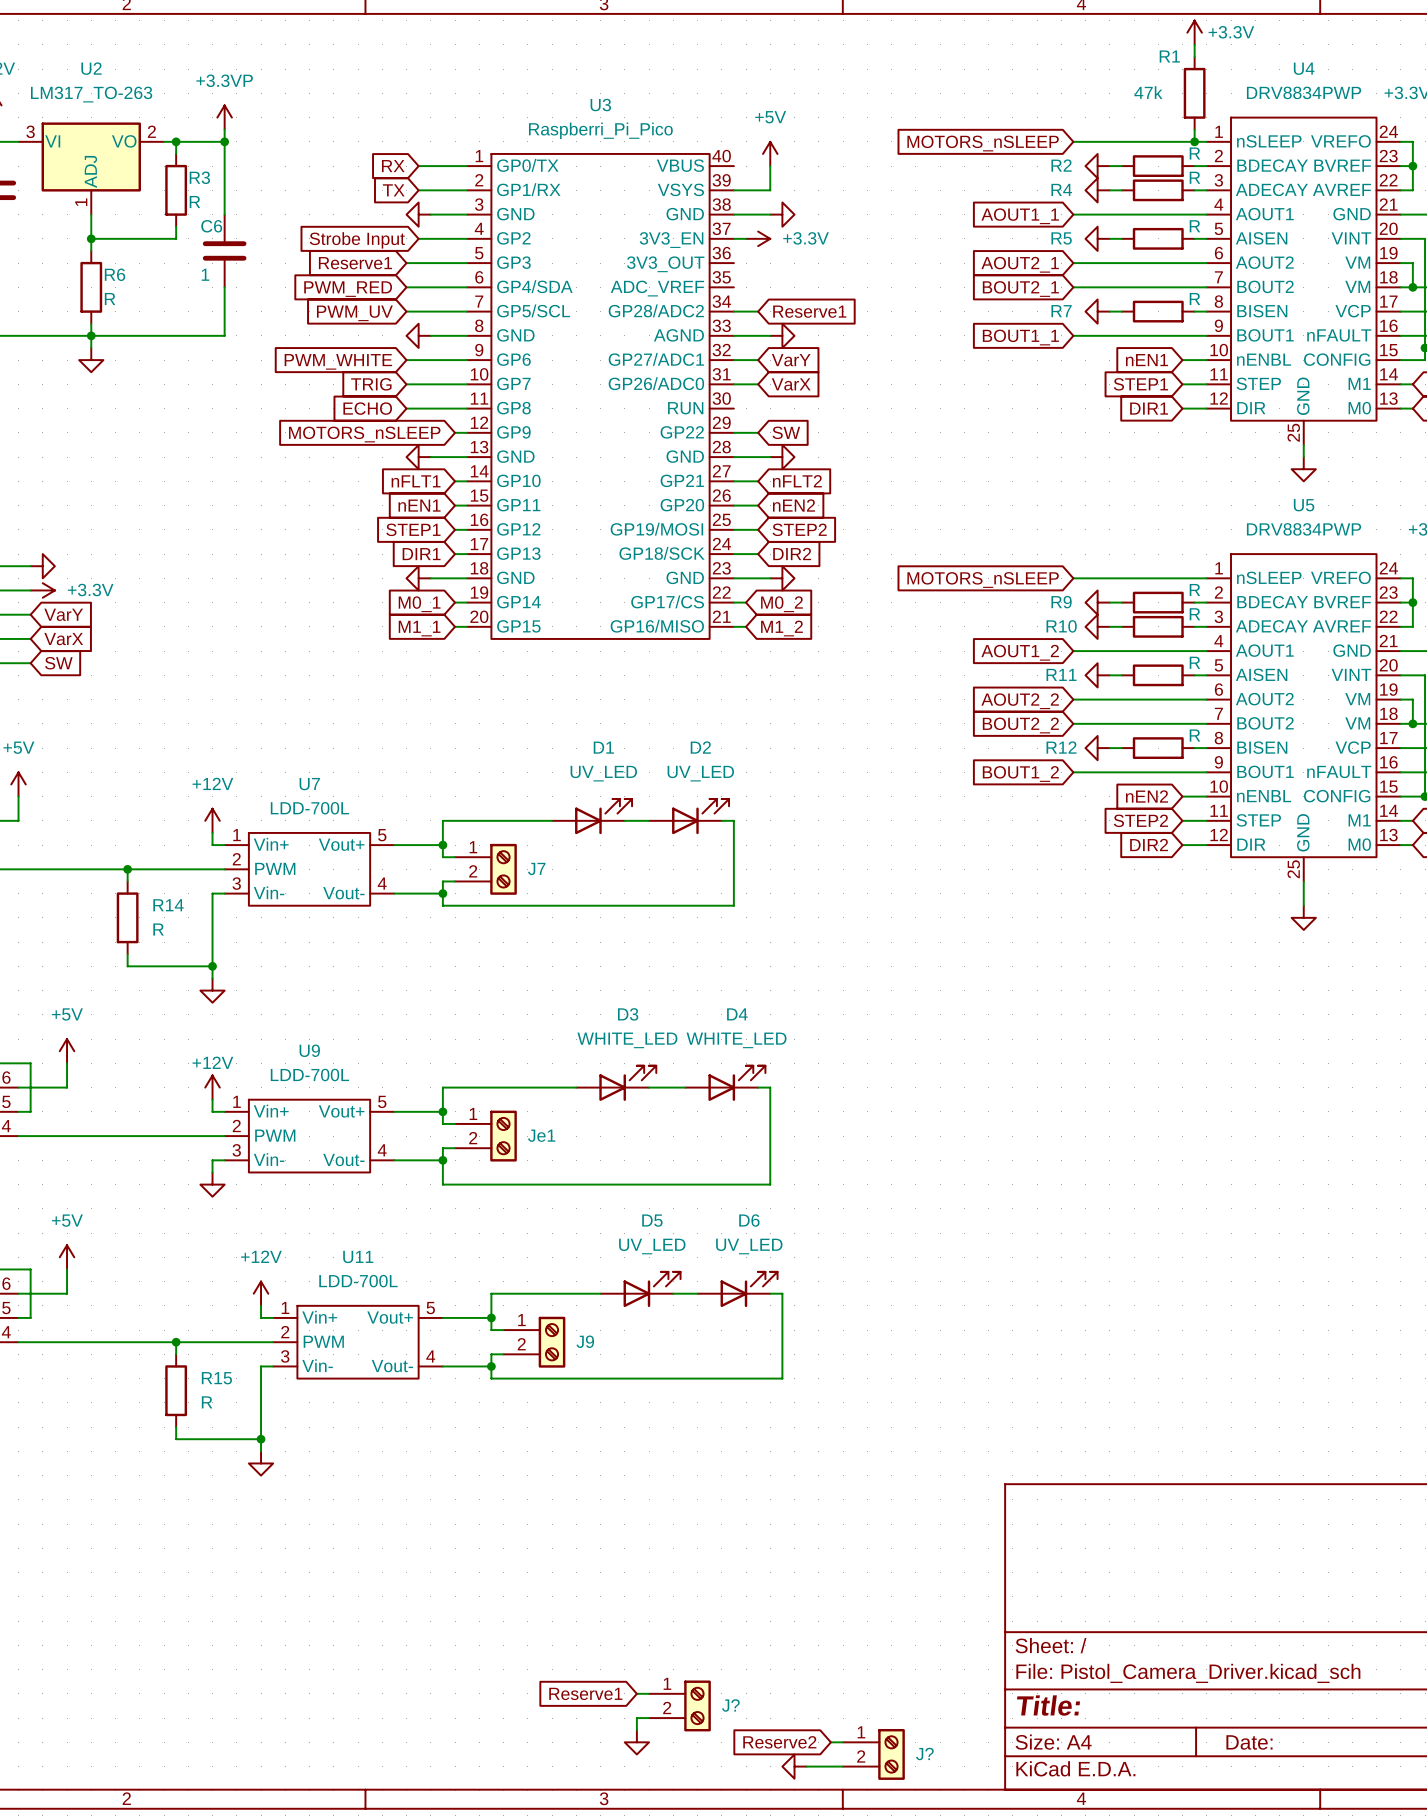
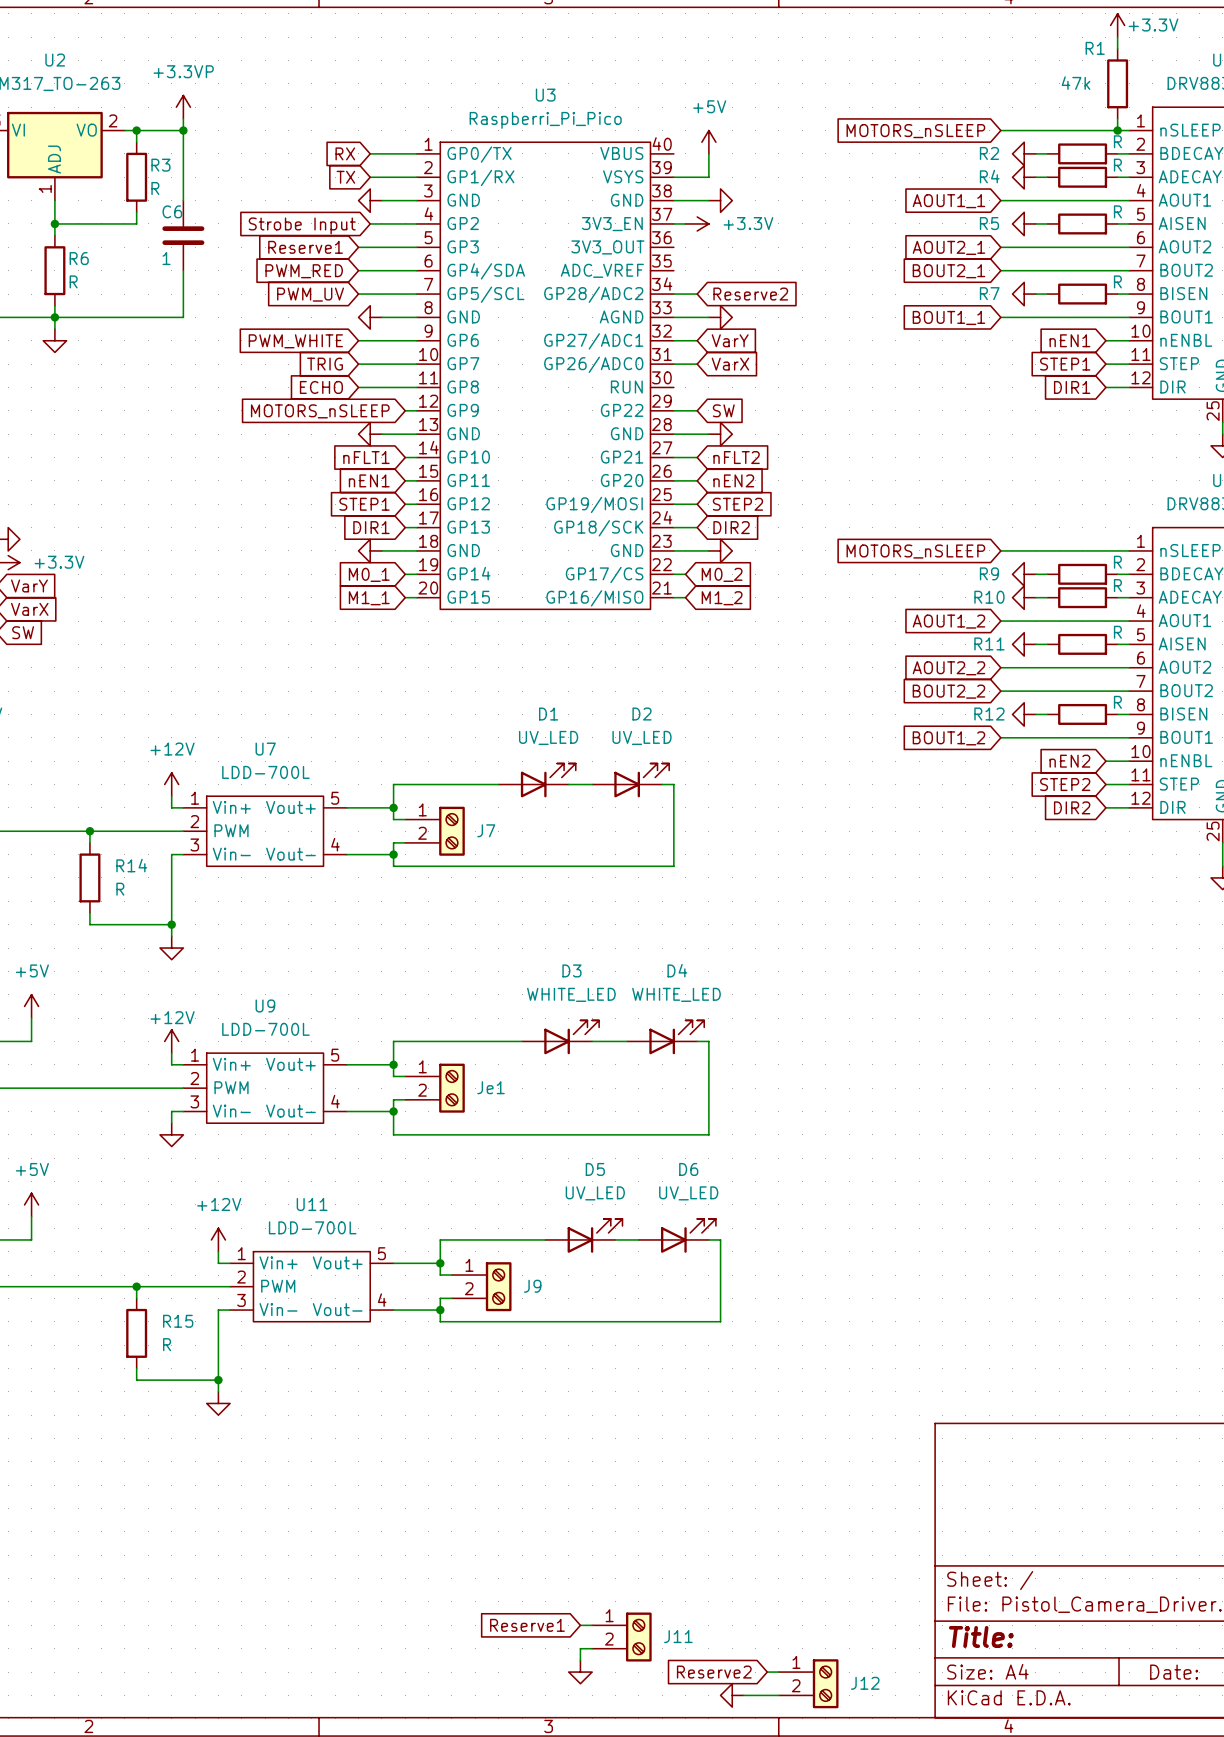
global label: Reserve1 (809, 311) -> Reserve2 (750, 294)
J? name: J? (730, 1705) -> J11 (678, 1636)
J? name: J? (924, 1753) -> J12 (865, 1683)

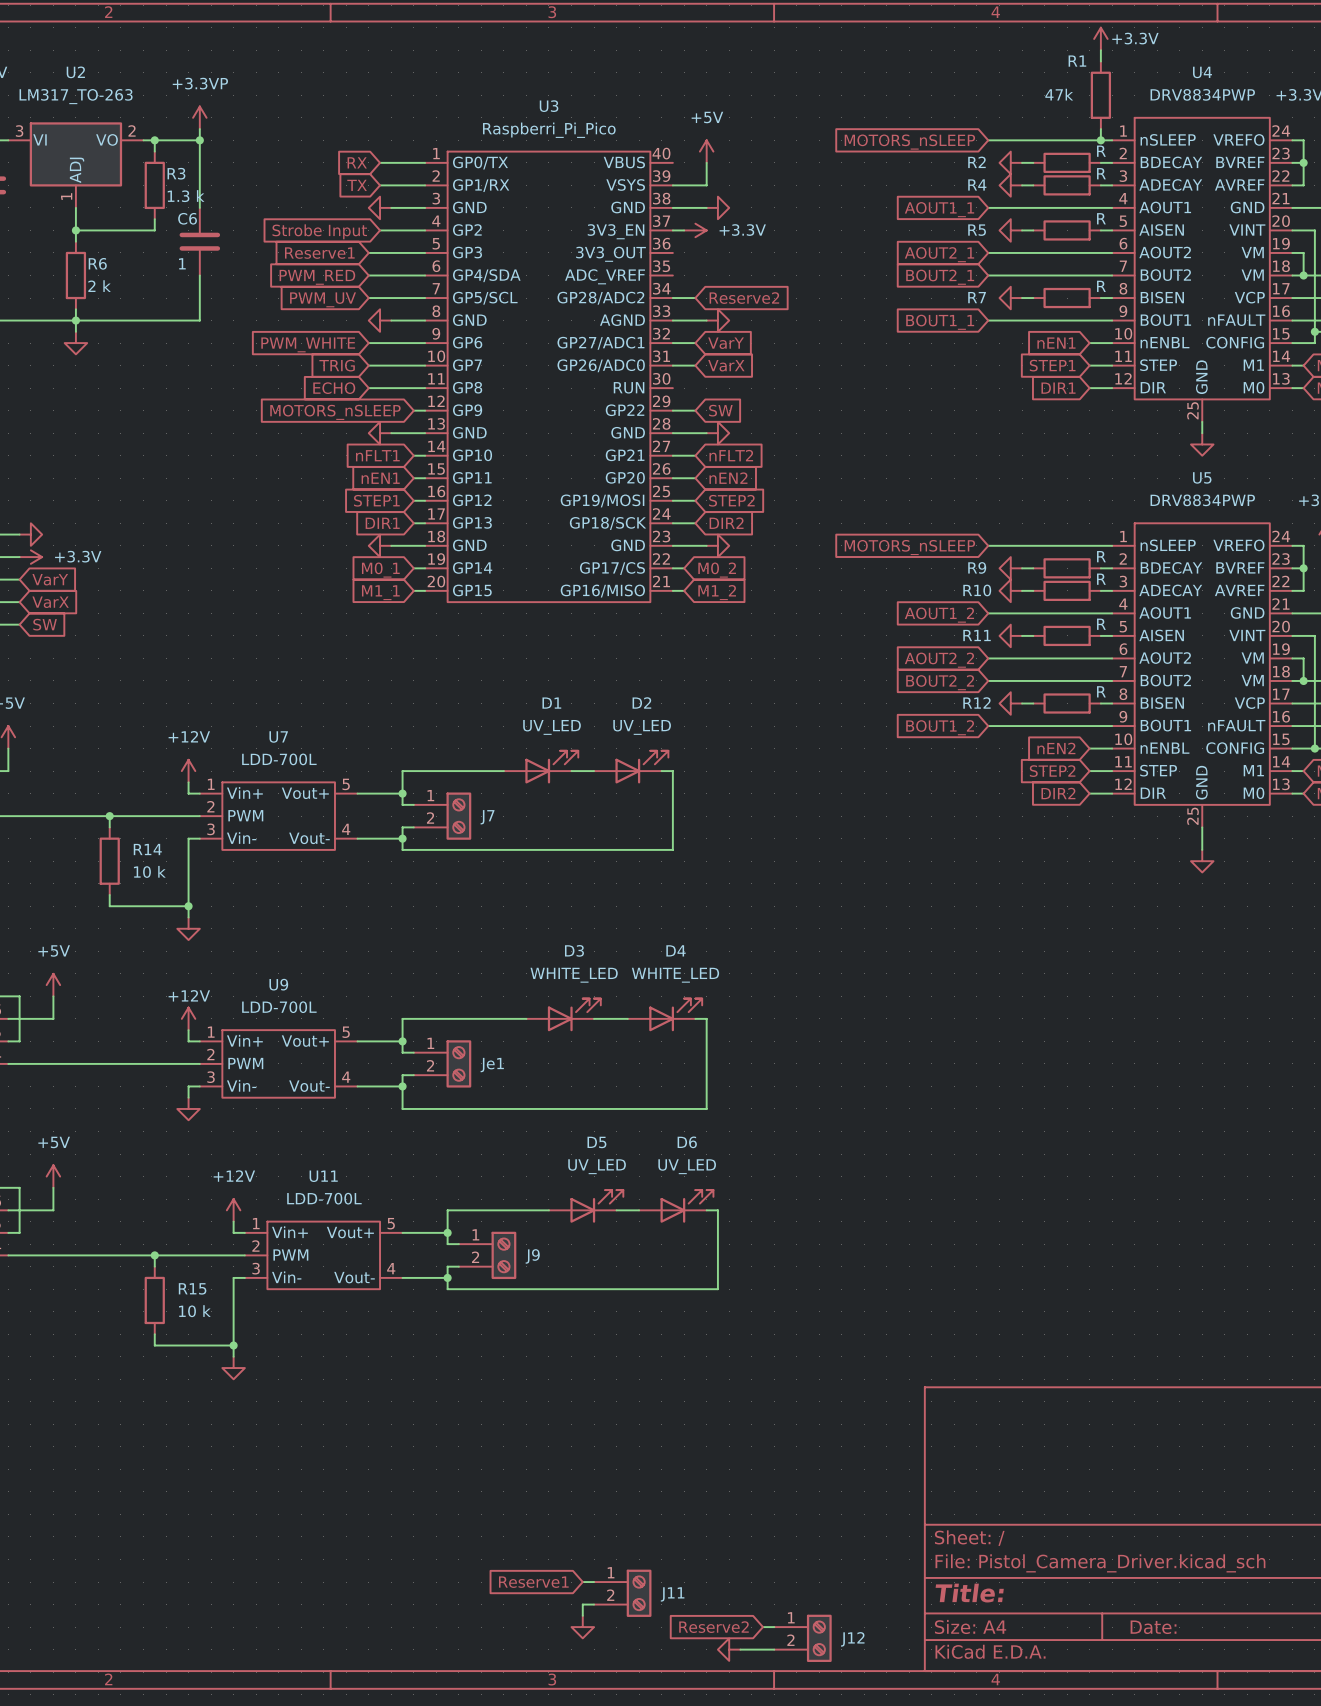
R3 value: R (155, 188) -> 1.3 k (186, 196)
R6 value: R (73, 281) -> 2 k (99, 286)
R14 value: R (120, 889) -> 10 k (149, 871)
R15 value: R (167, 1344) -> 10 k (194, 1311)

